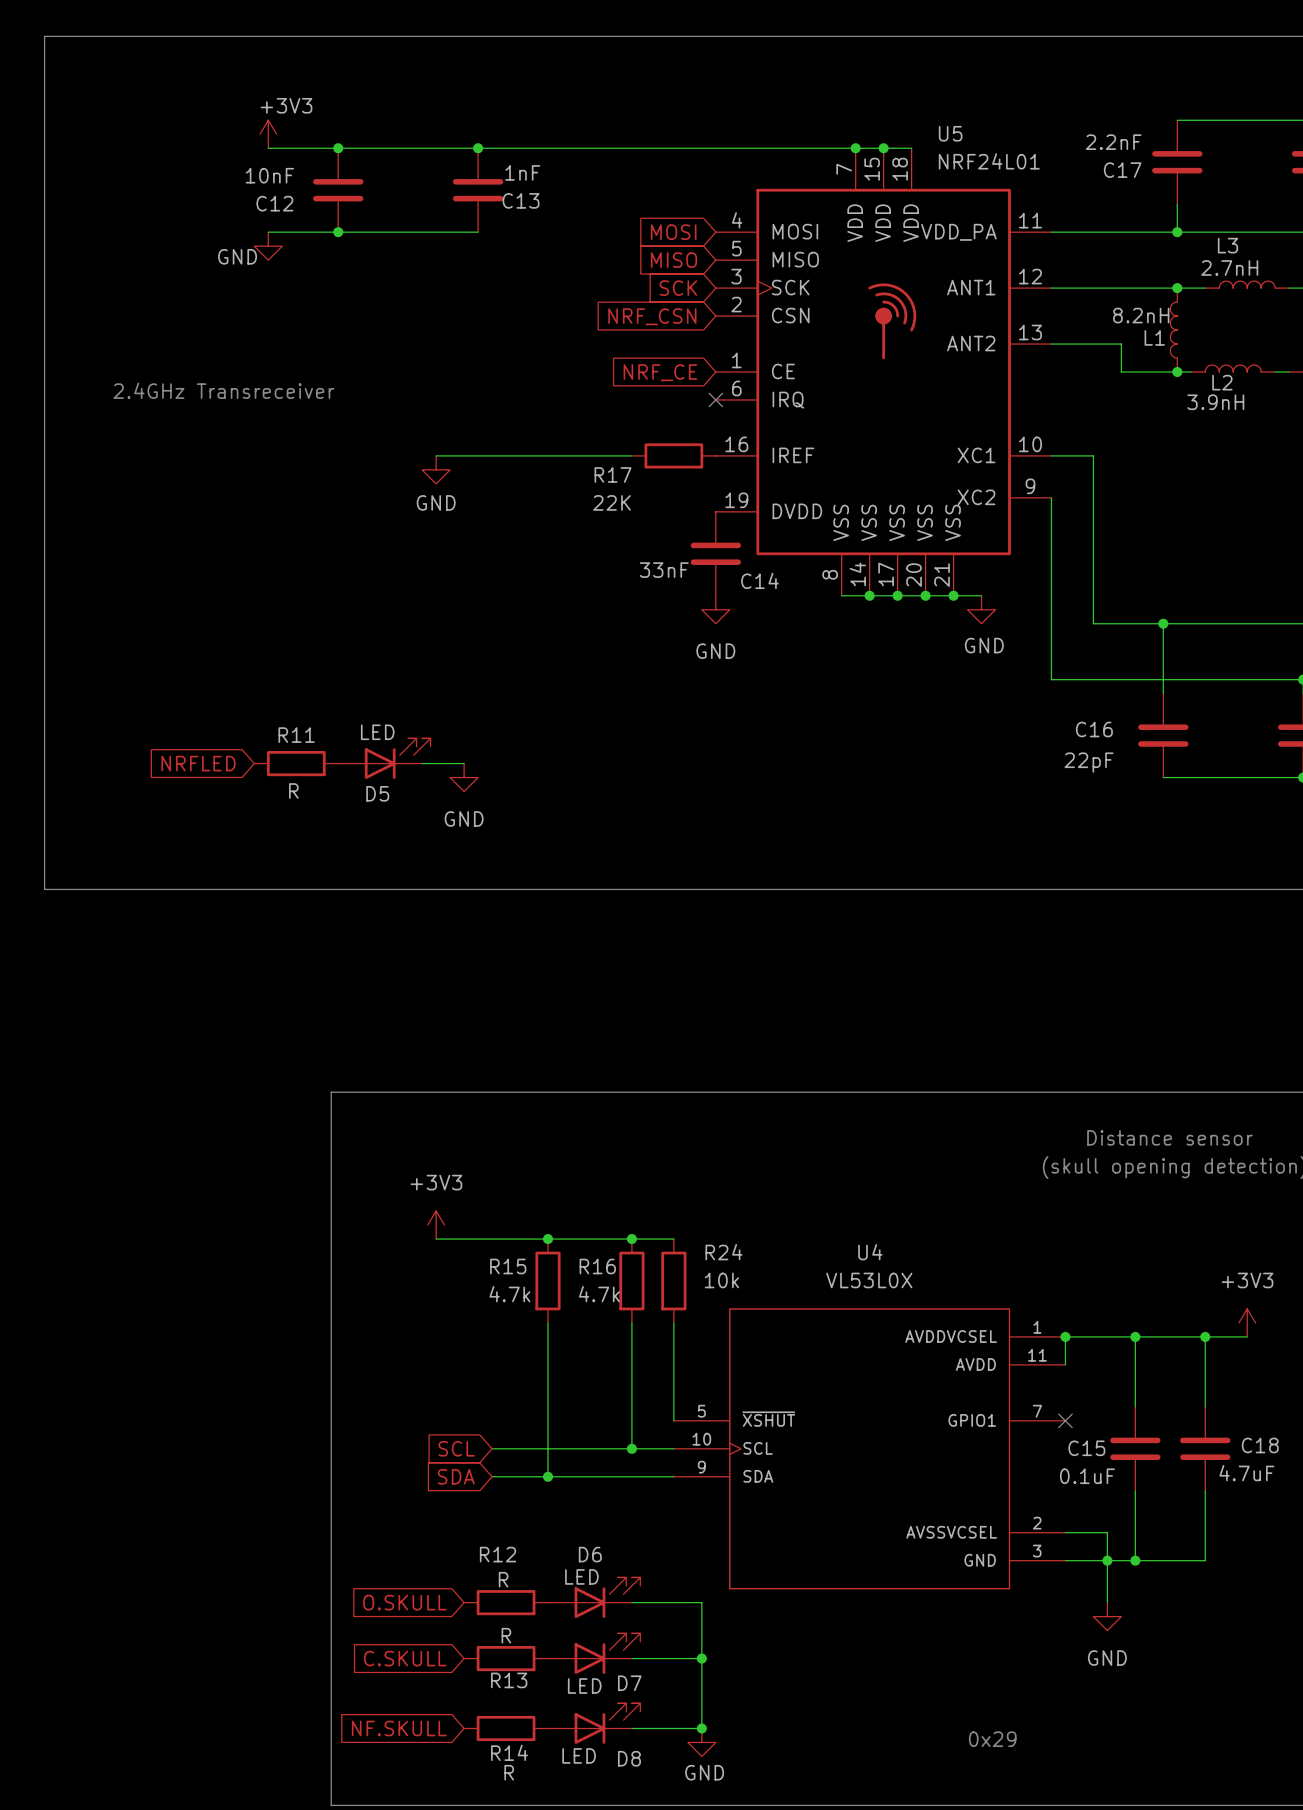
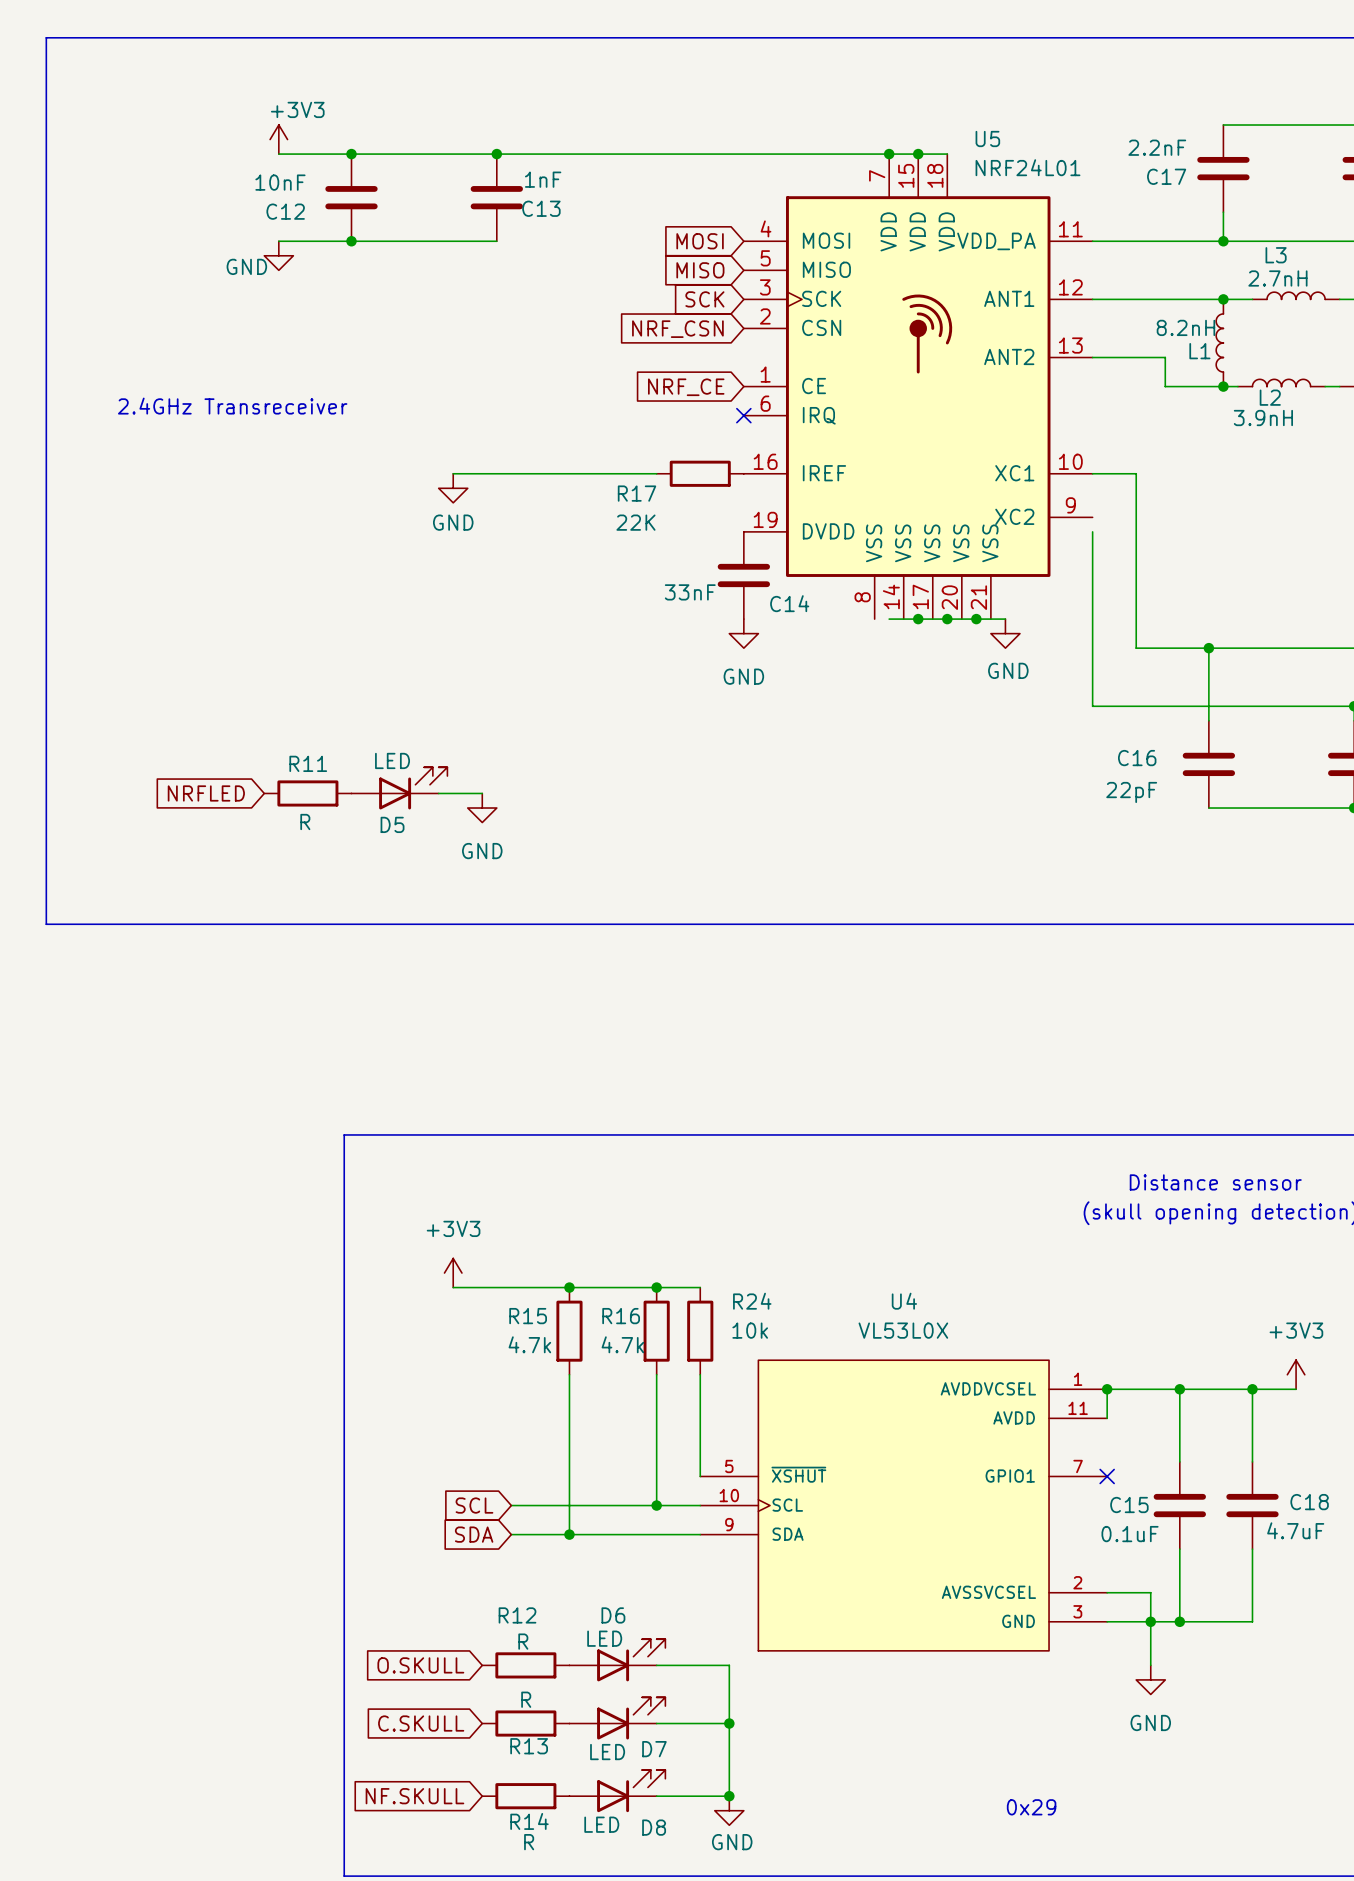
wire: (1051, 497) (1051, 511) -> none
wire: (841, 595) (855, 595) -> none
junction: (869, 595) -> none
junction: none -> (918, 619)
junction: (897, 595) -> none
junction: none -> (947, 619)
junction: (925, 595) -> none
junction: none -> (976, 619)
junction: (953, 595) -> none
wire: (967, 595) (981, 595) -> none
power symbol position: GND (981, 609) -> GND (1005, 633)

